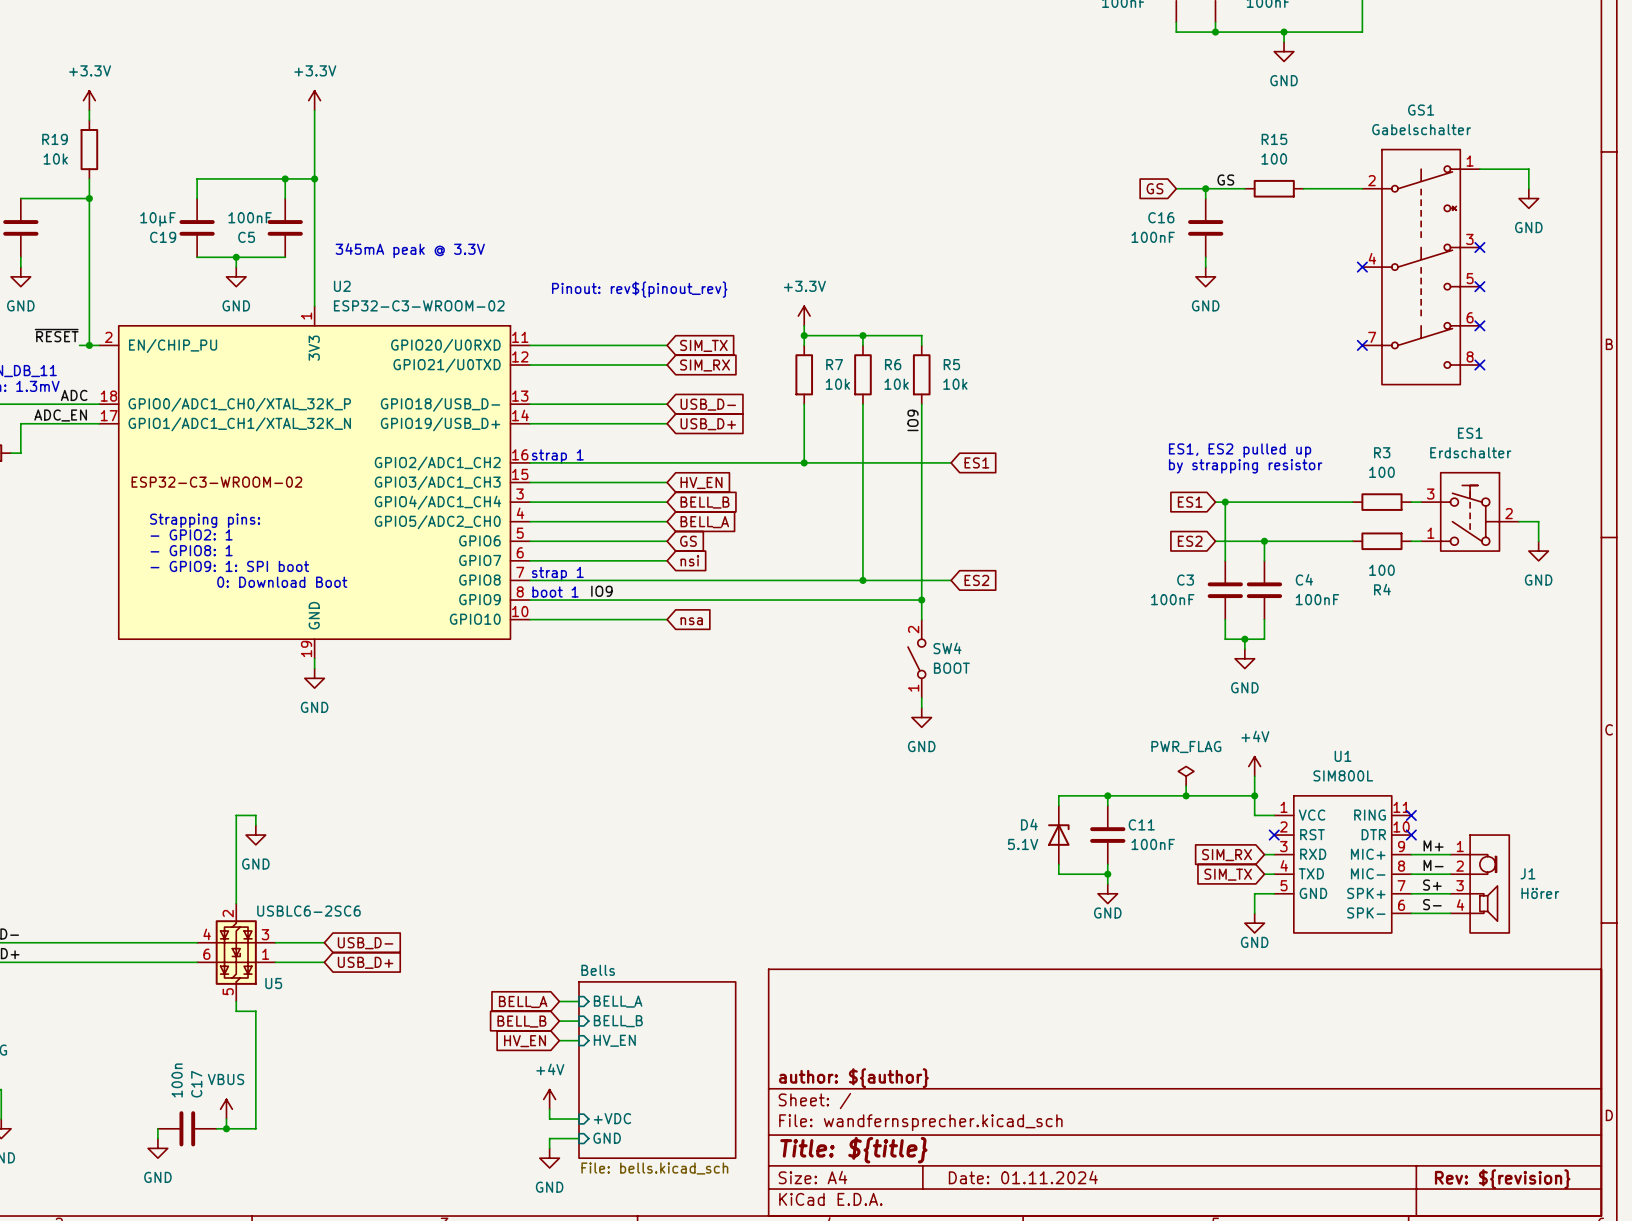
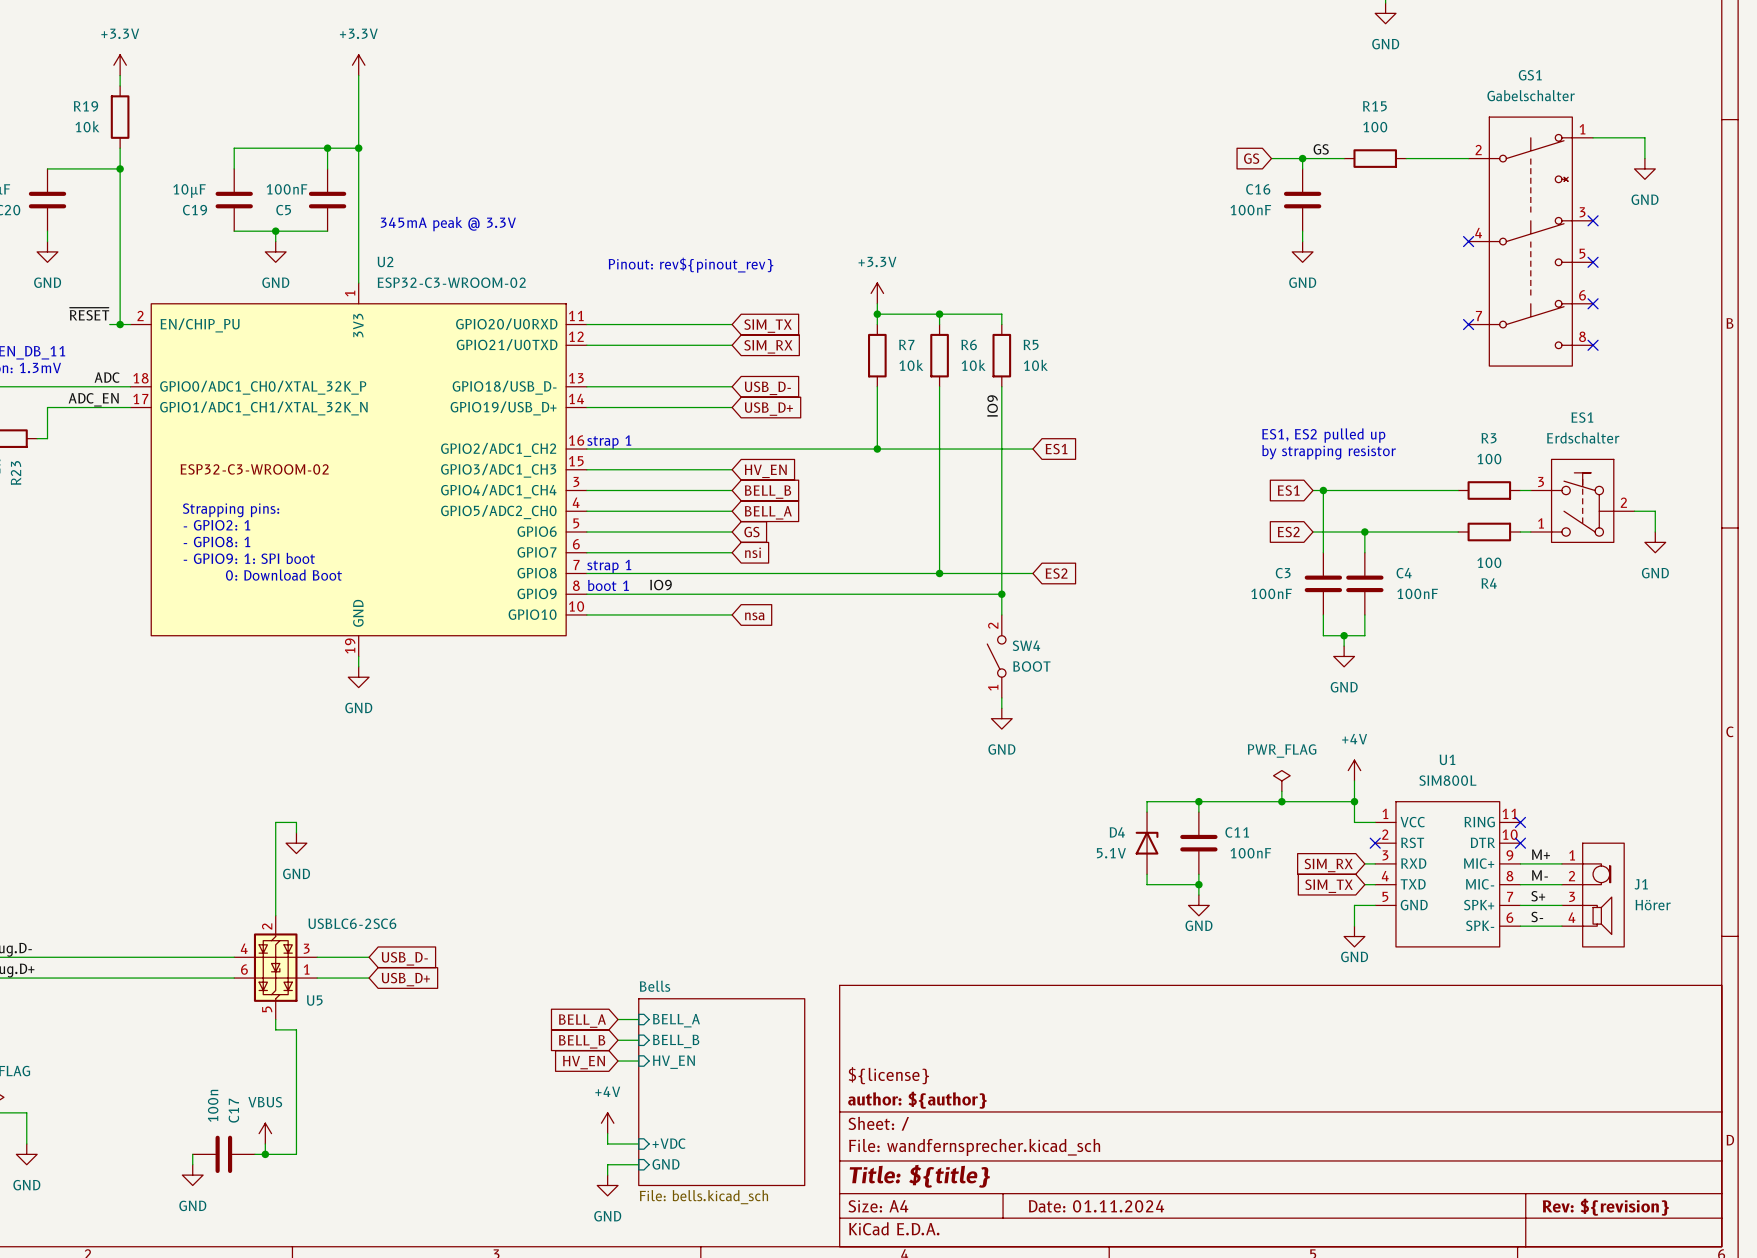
title block: none -> ${license} (888, 1075)

